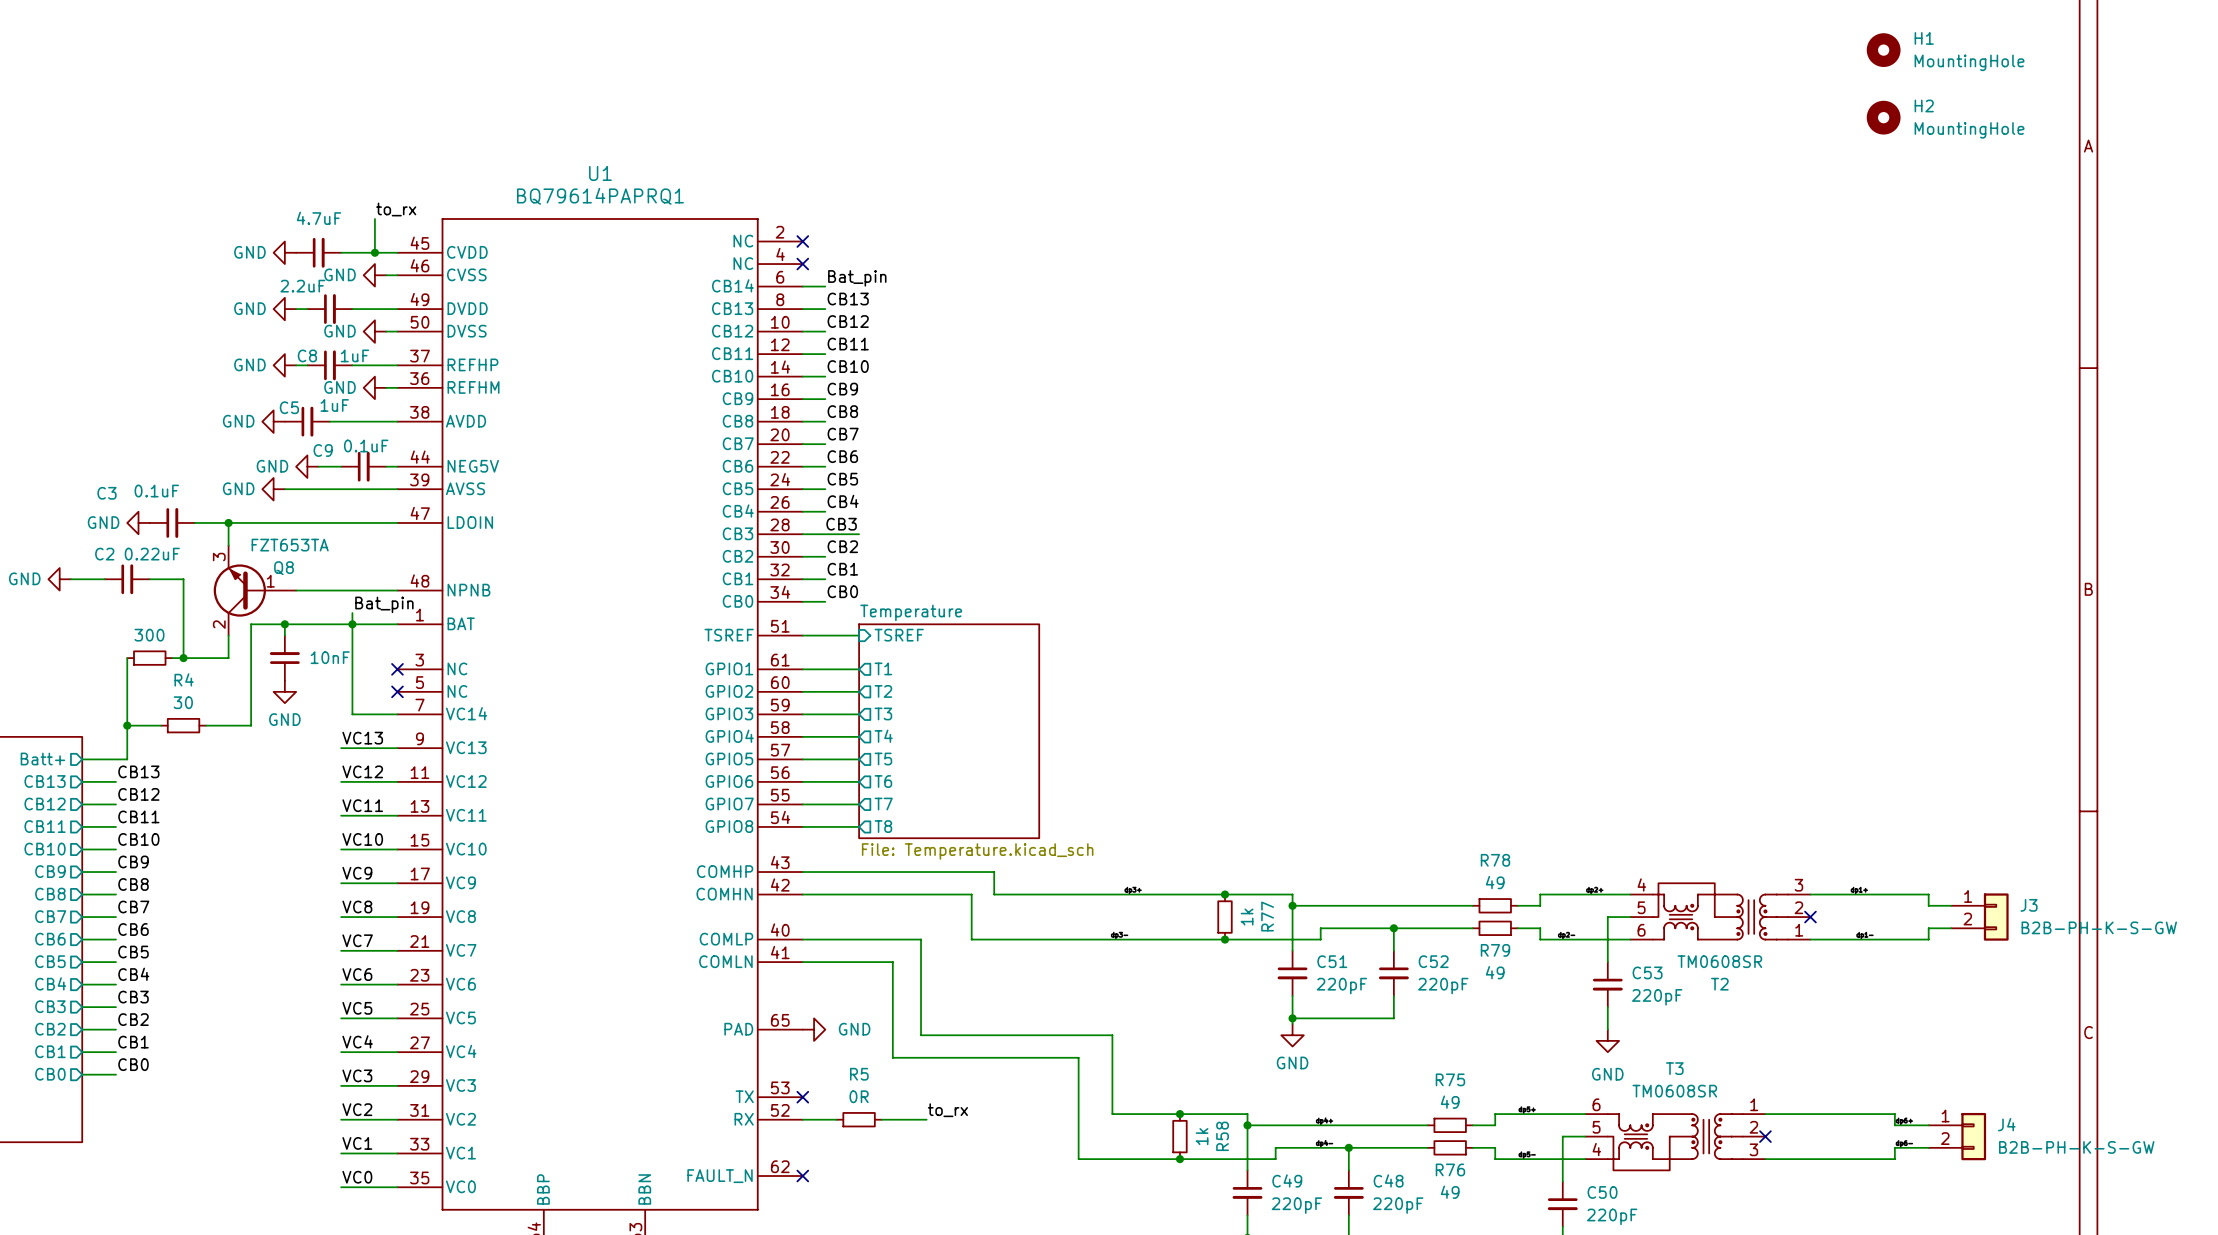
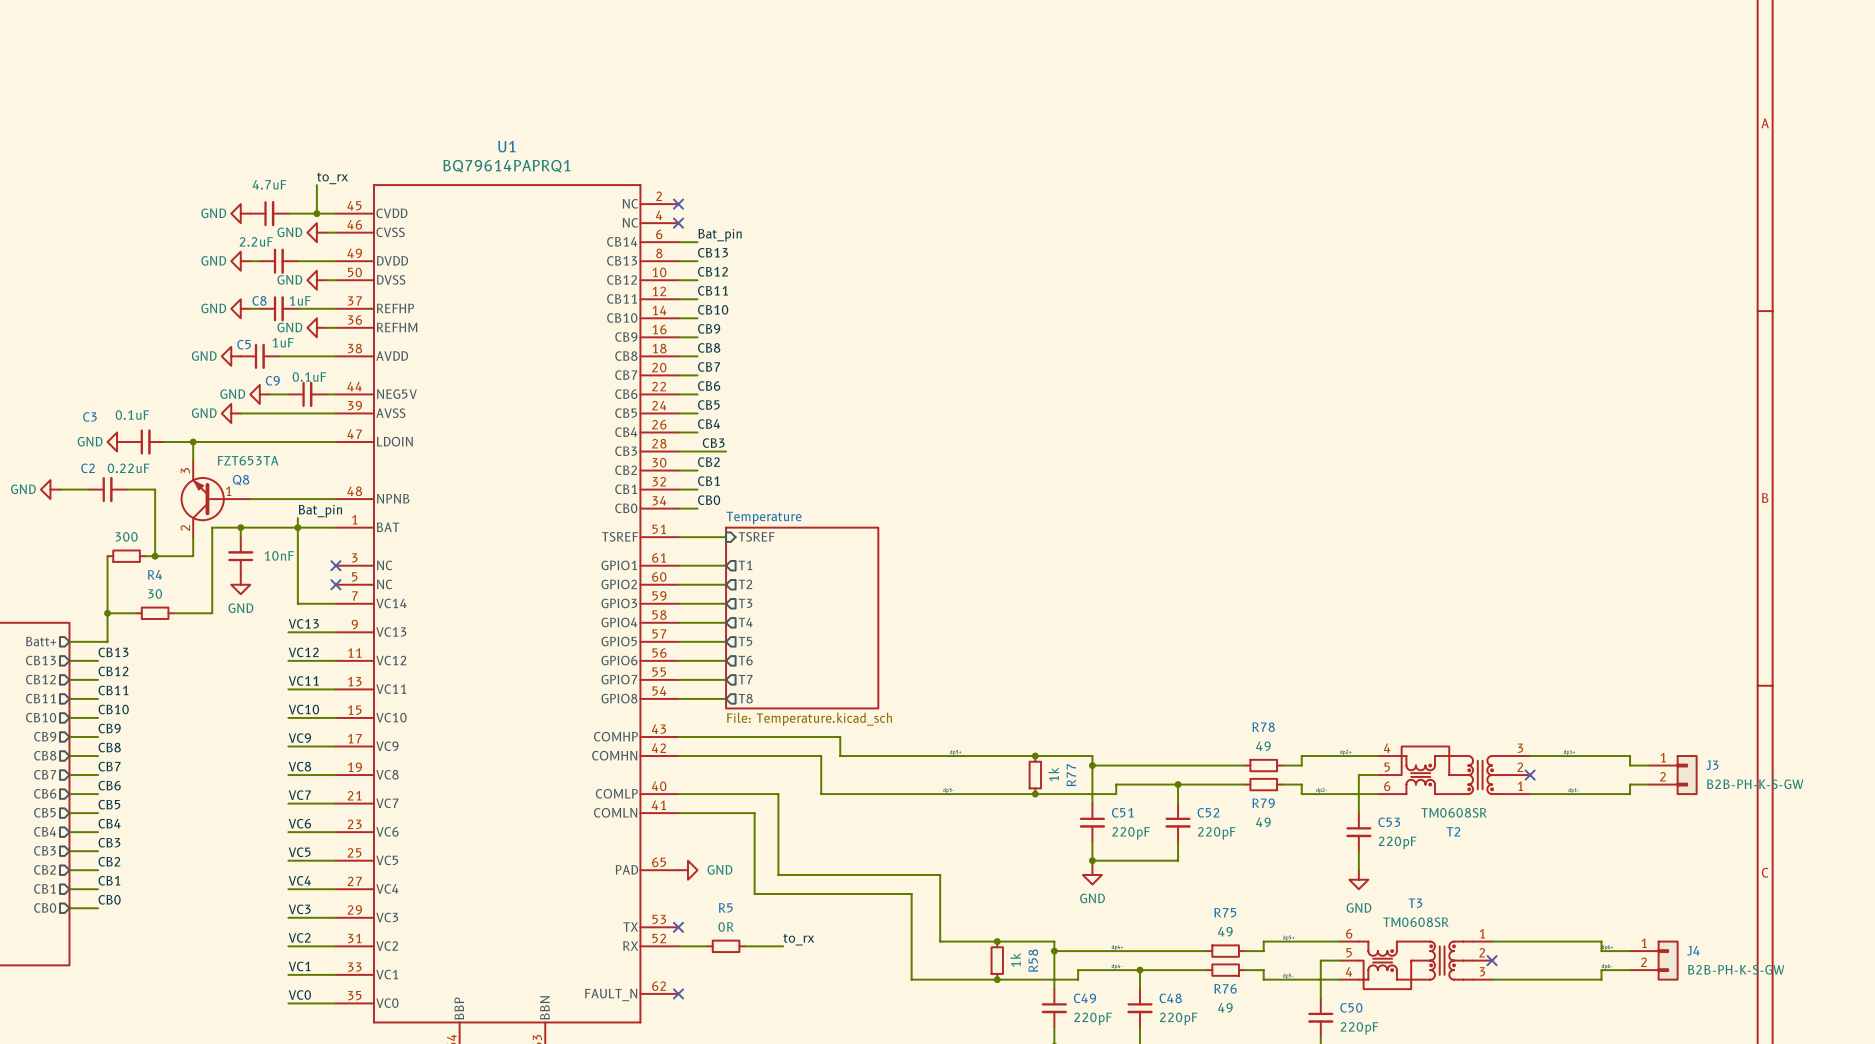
H1: MountingHole (1883, 50) -> none
H2: MountingHole (1883, 117) -> none

